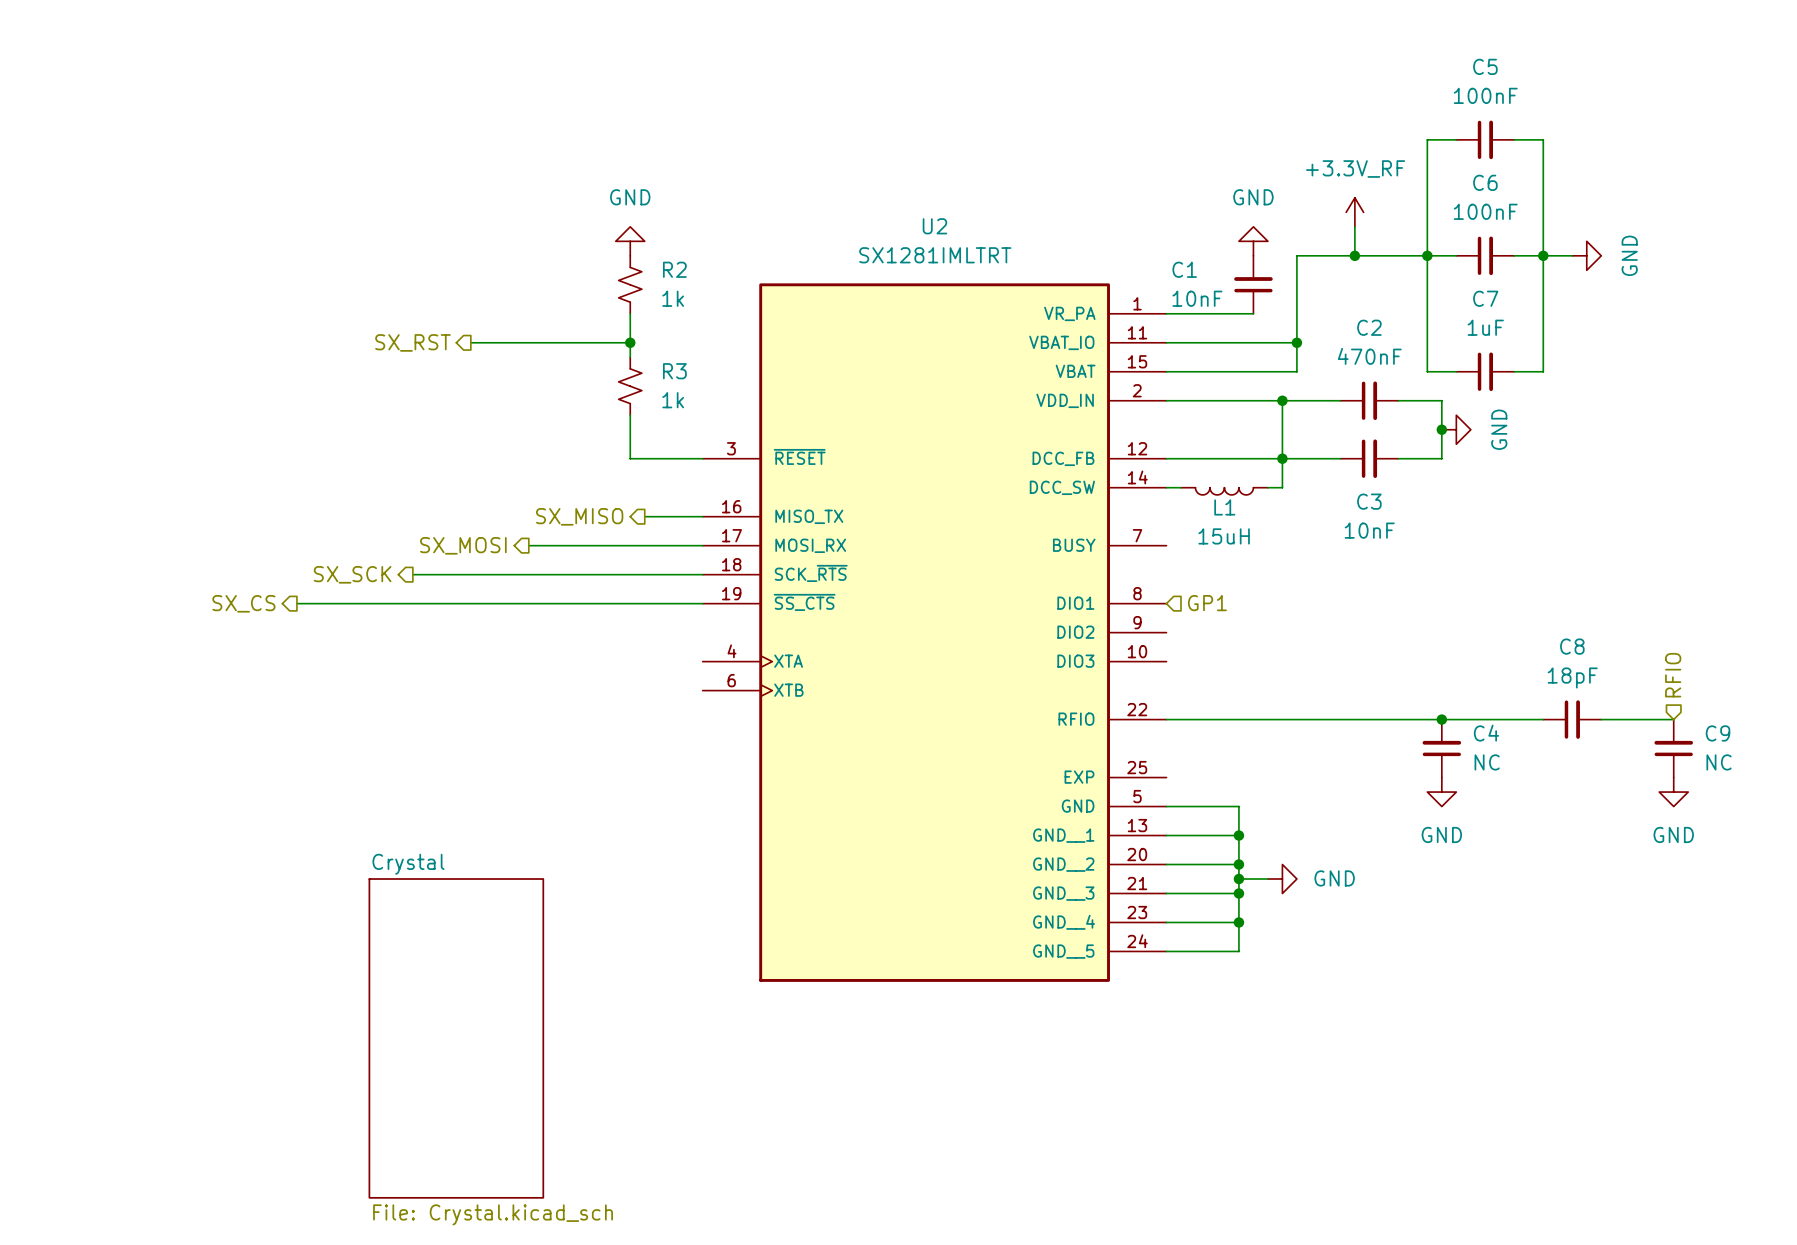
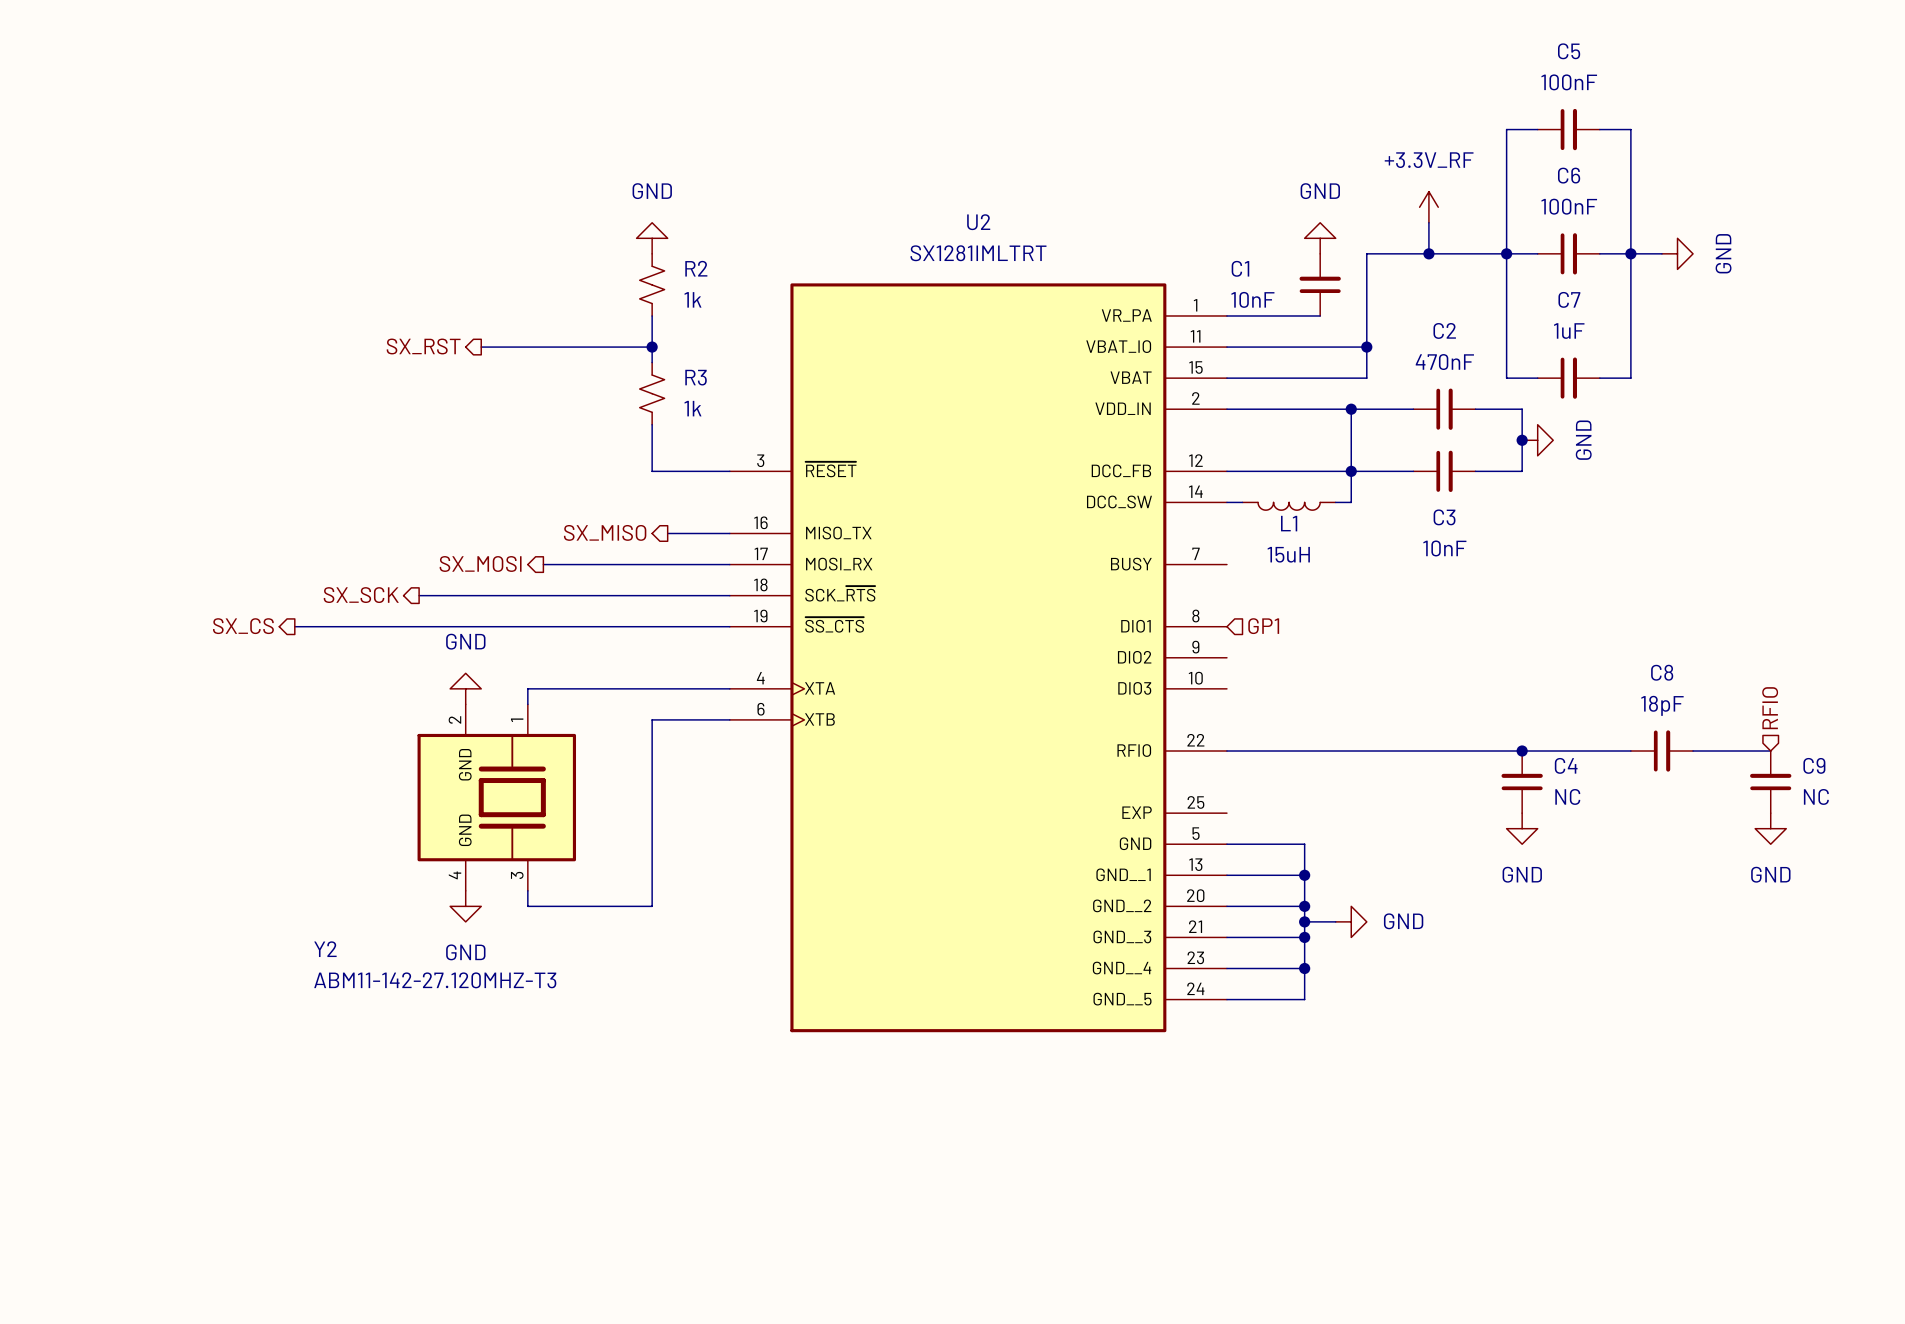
power symbol: none -> GND (465, 688)
wire: none -> (729, 688) (527, 688) (527, 704)
wire: none -> (729, 719) (652, 719) (652, 906) (527, 906) (527, 890)
Y2: none -> ABM11-142-27.120MHZ-T3 (496, 797)
power symbol: none -> GND (465, 906)
sheet Crystal: File: Crystal.kicad_sch (456, 1038) -> none

